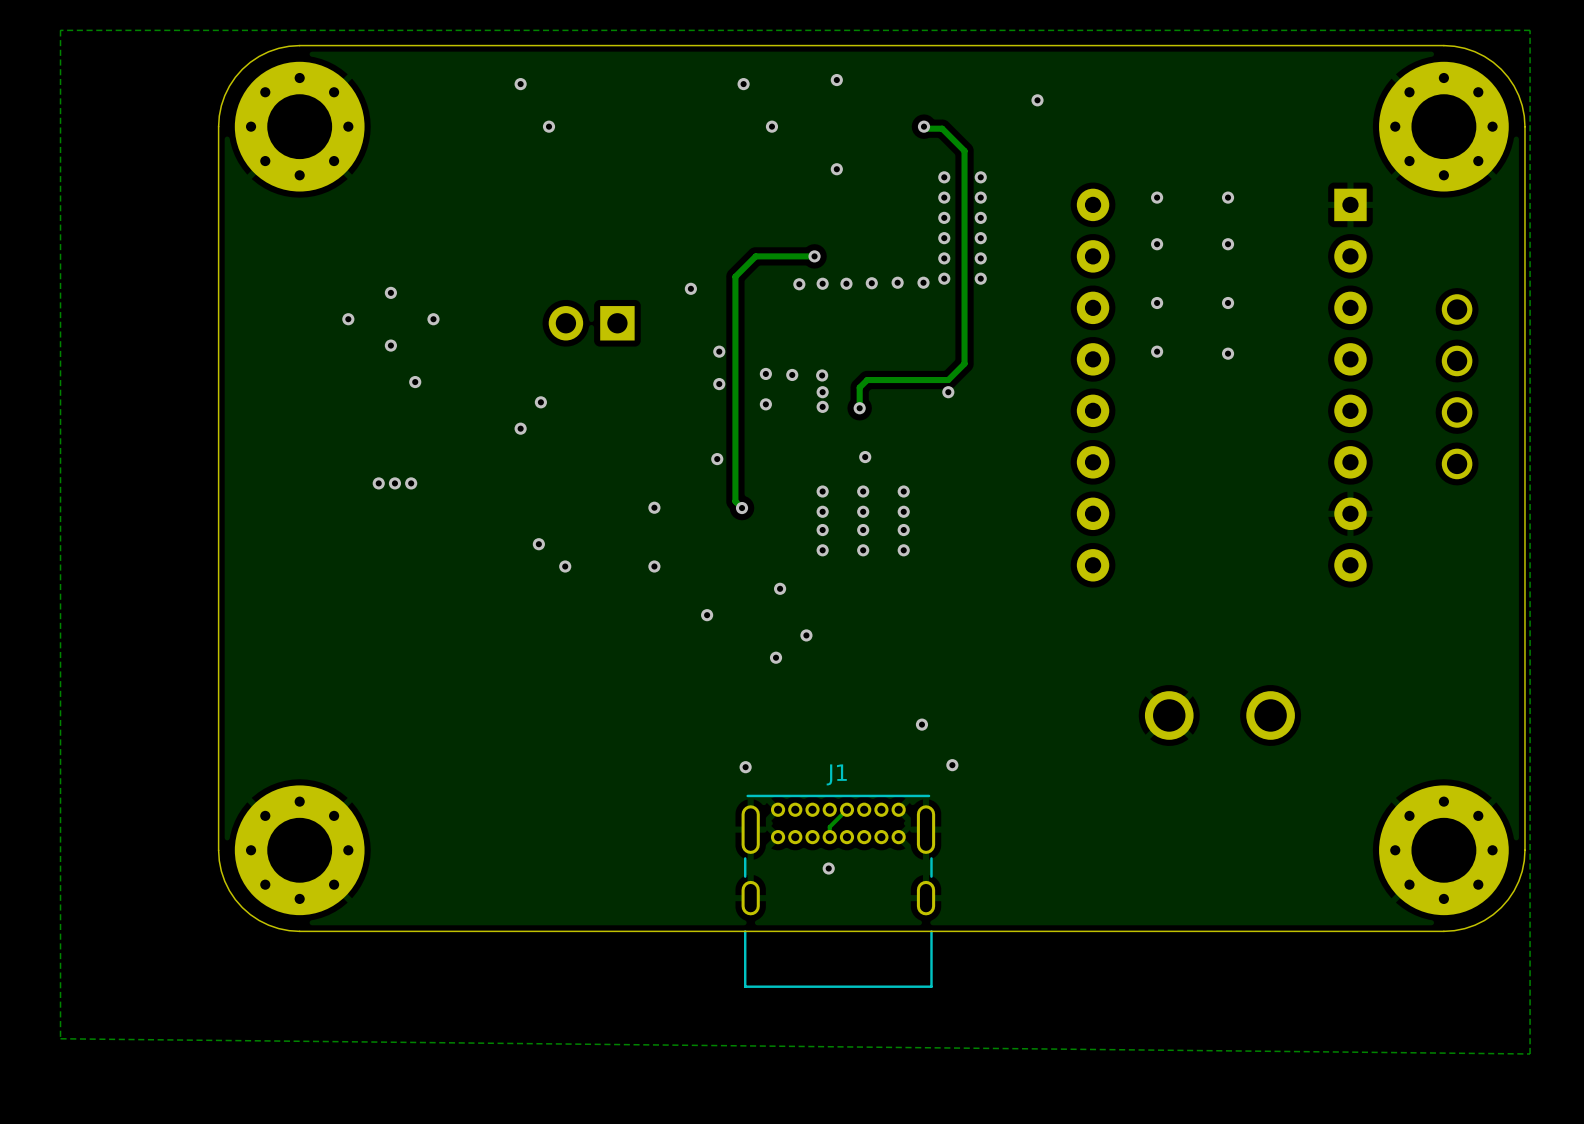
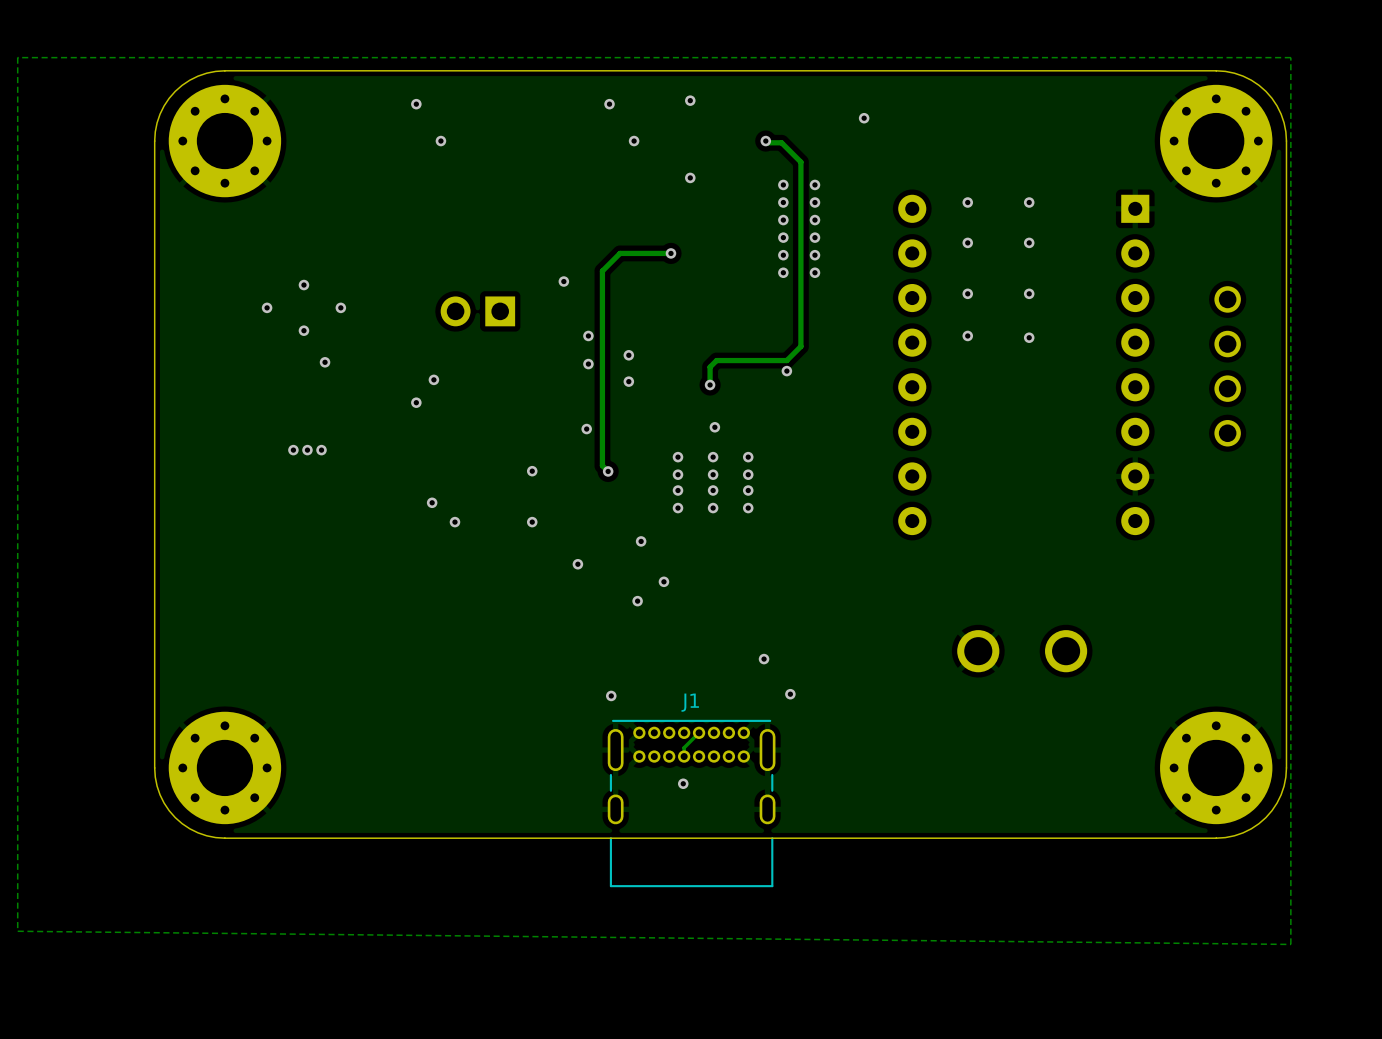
via: (897, 282) -> none
via: (923, 282) -> none
via: (822, 283) -> none
via: (846, 283) -> none
via: (871, 283) -> none
via: (799, 284) -> none
via: (792, 374) -> none
via: (822, 375) -> none
via: (822, 392) -> none
via: (822, 406) -> none

